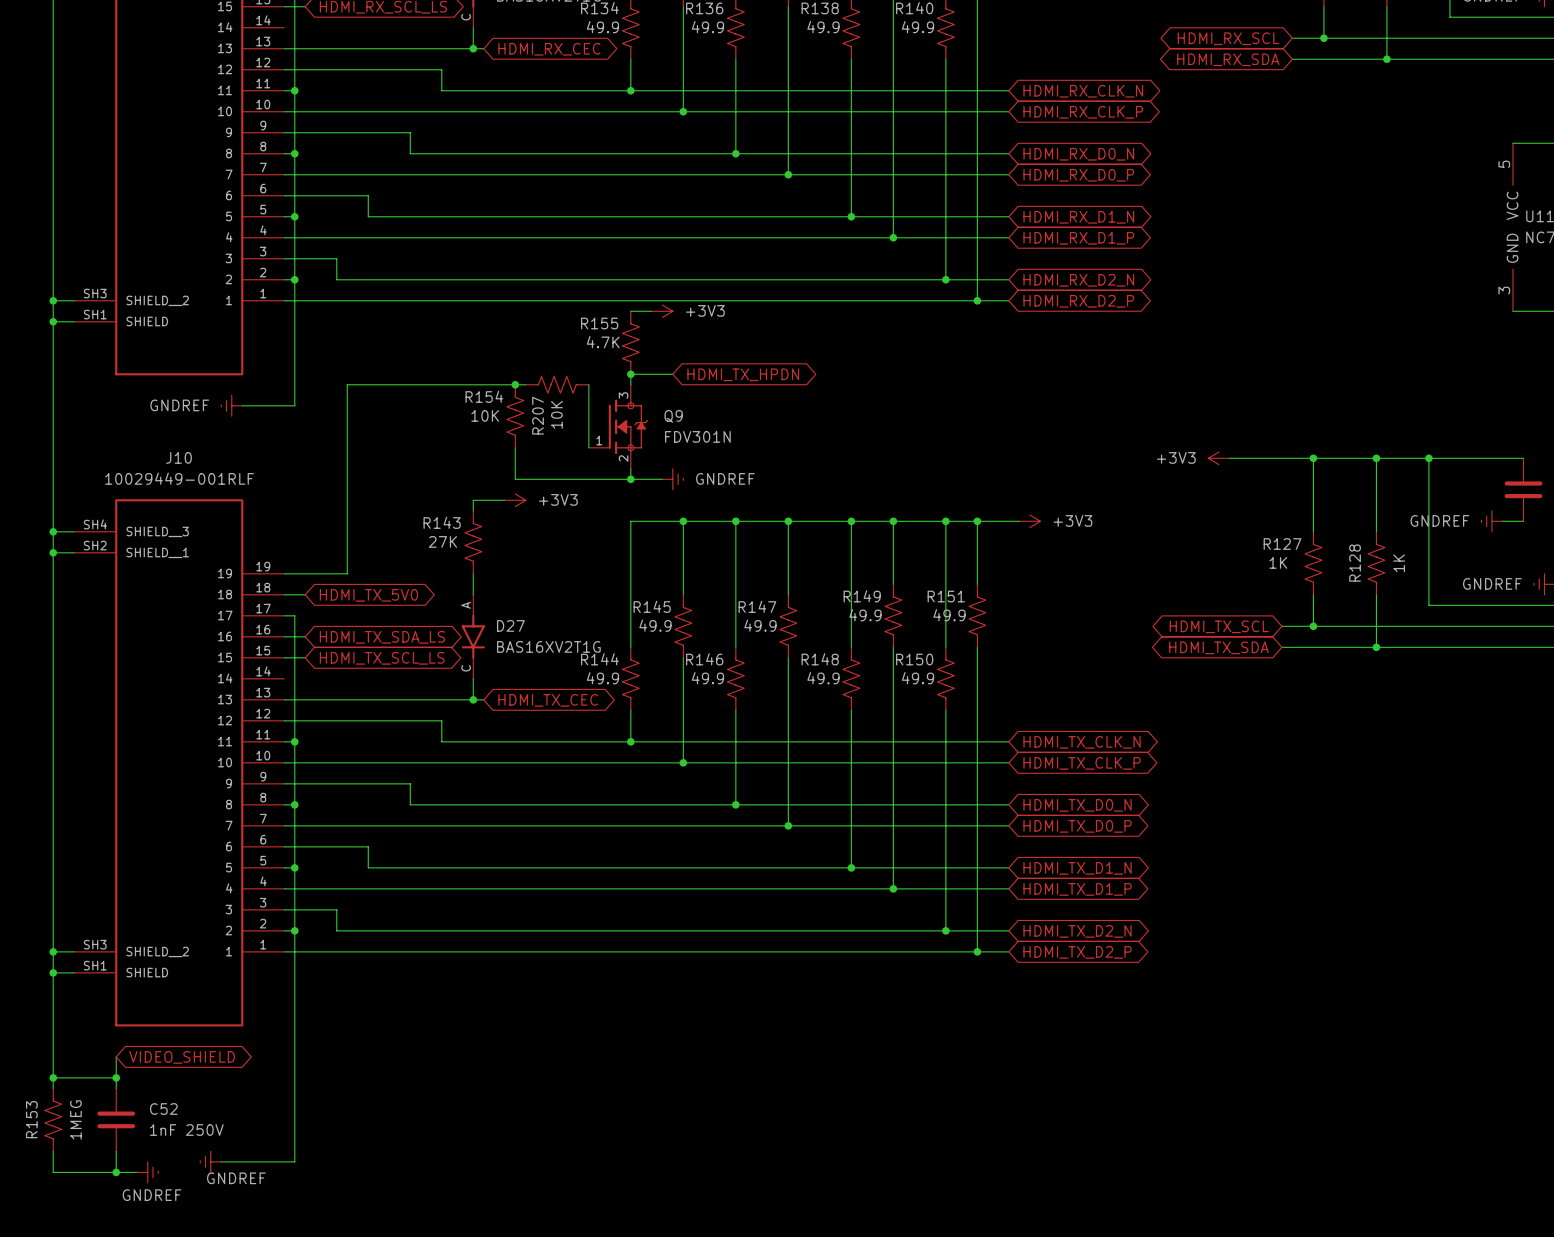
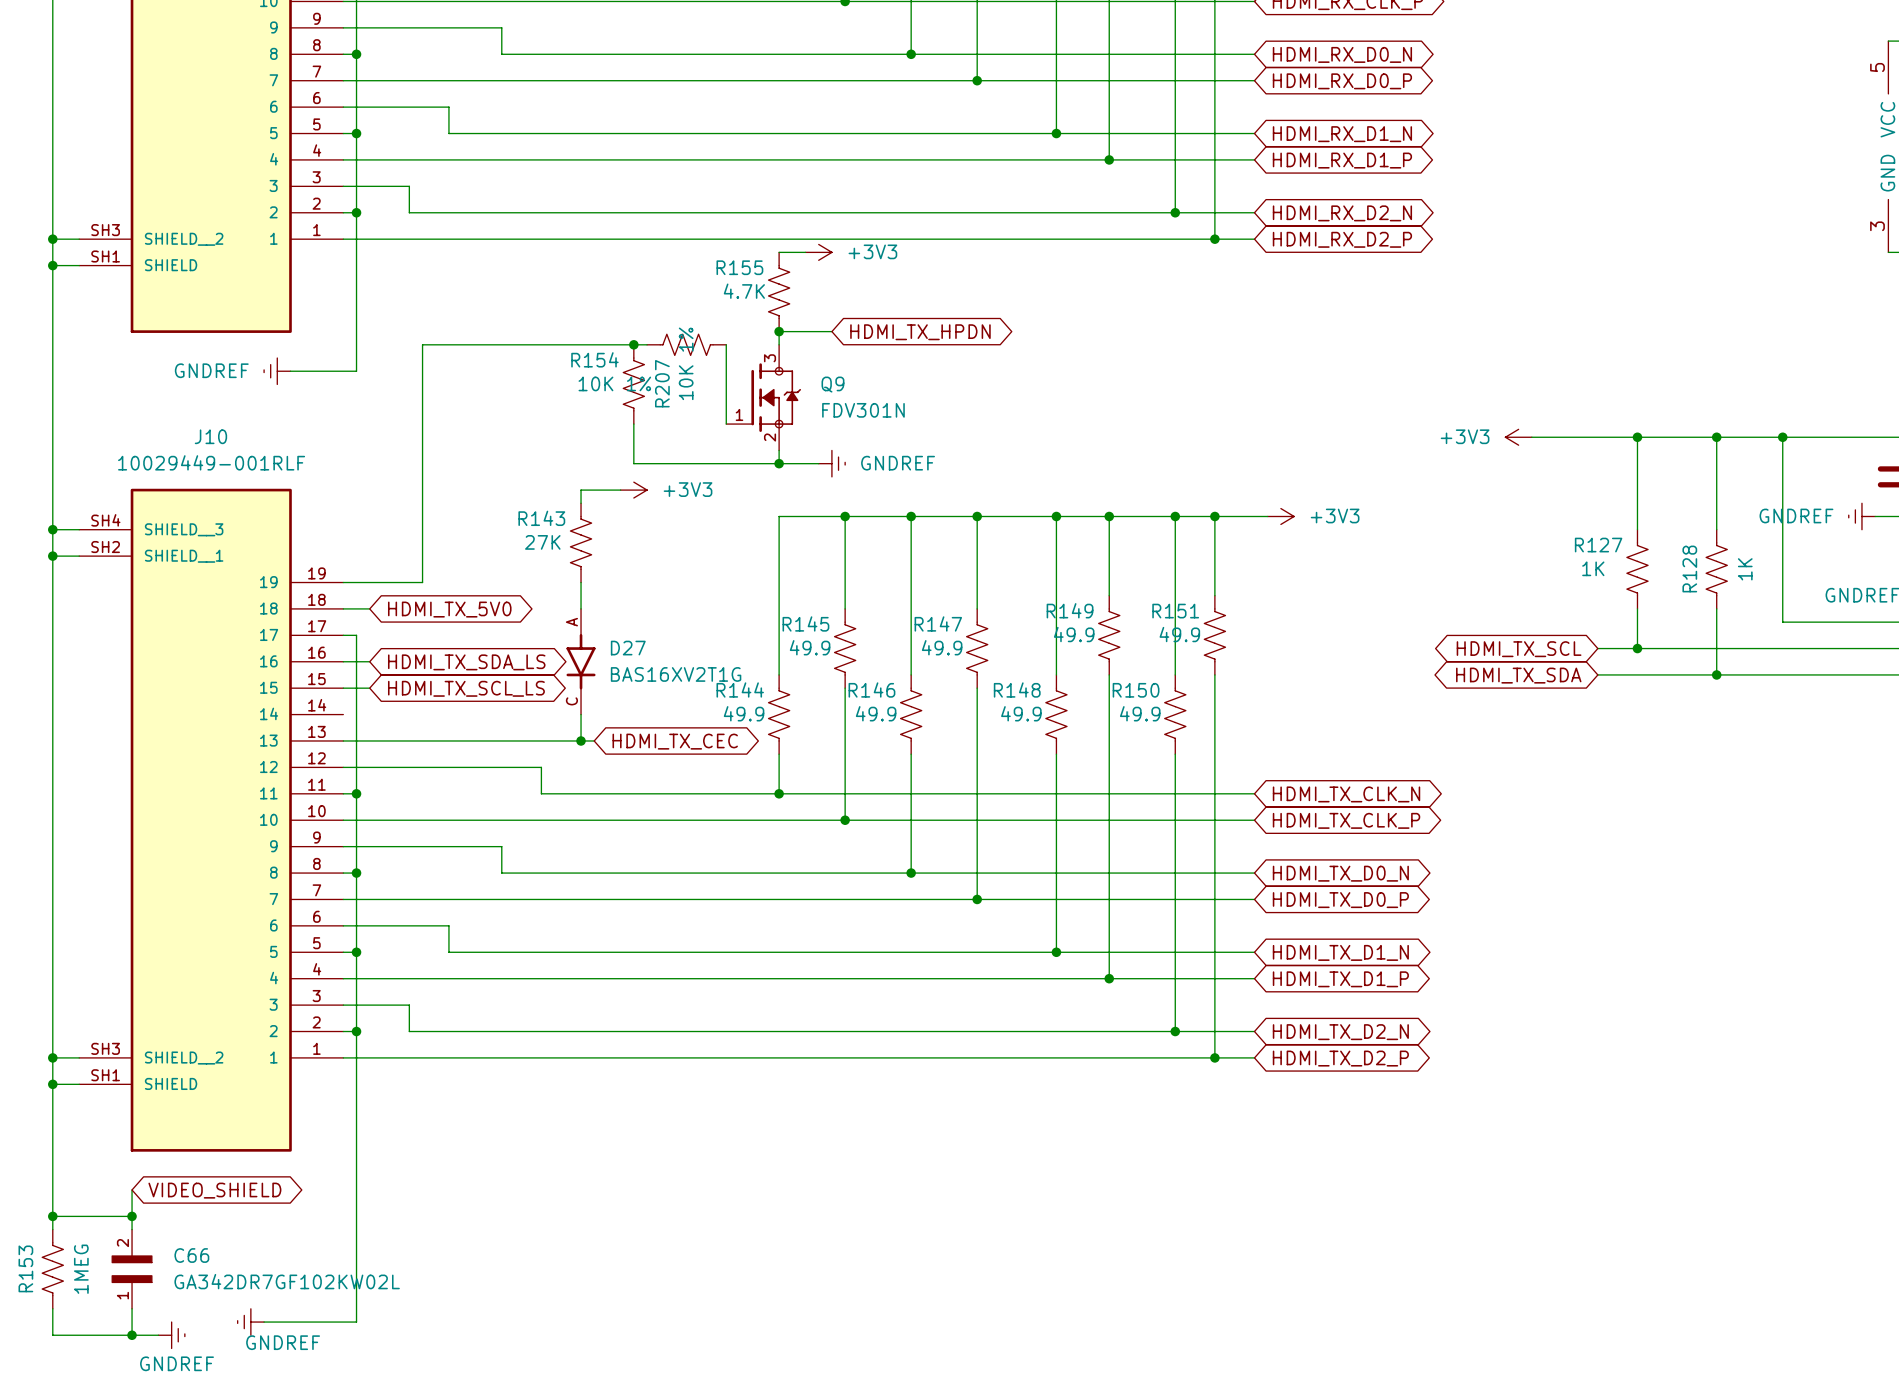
R207 value: 10K (556, 414) -> 10K 1% (686, 363)
R154 value: 10K (485, 415) -> 10K 1% (614, 383)
C52: 1nF 250V (116, 1119) -> none
C66: none -> GA342DR7GF102KW02L (132, 1269)

